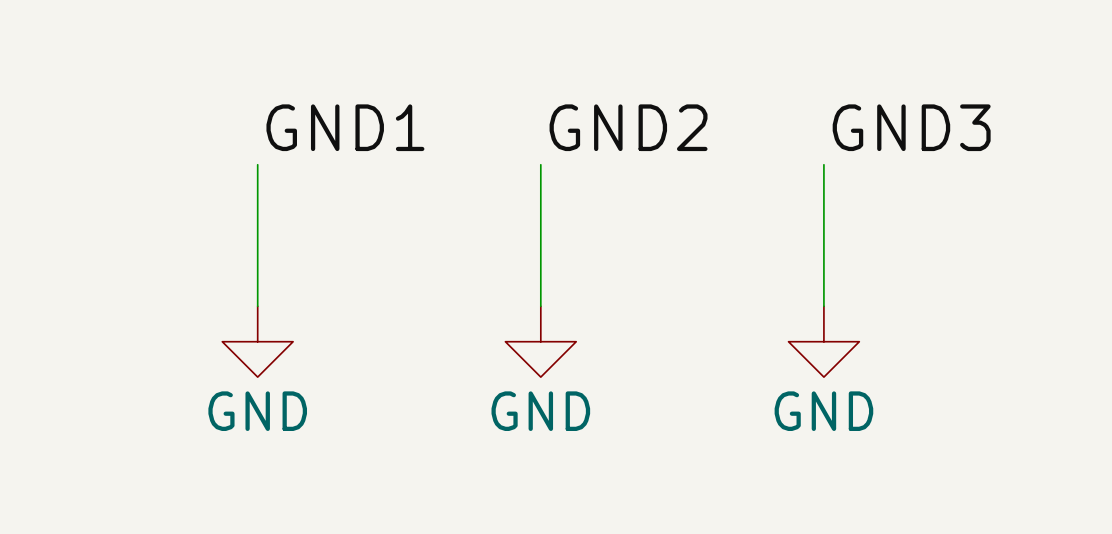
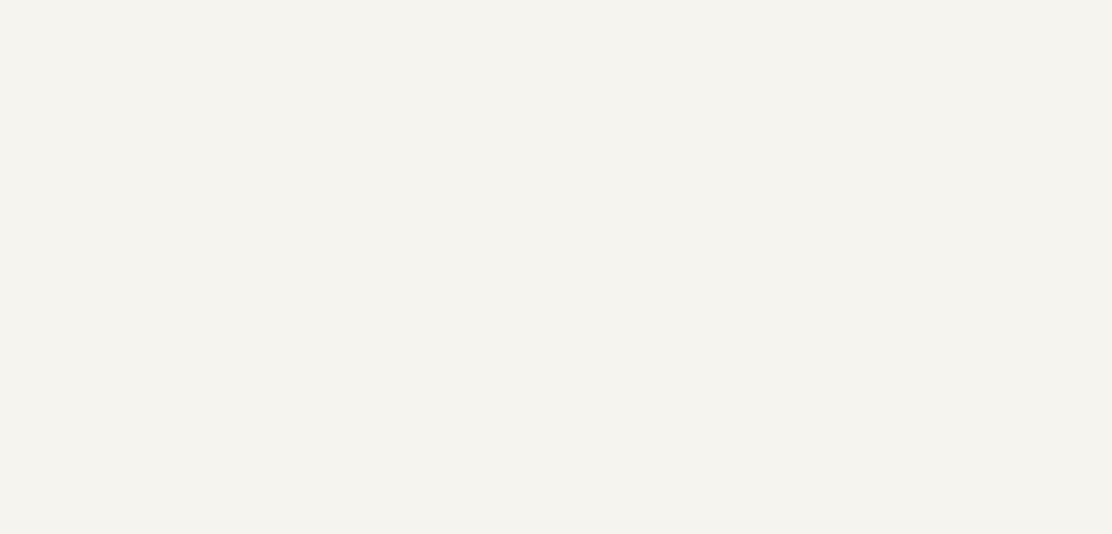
label: GND1 (345, 127) -> none
label: GND2 (628, 127) -> none
label: GND3 (911, 127) -> none
wire: (257, 164) (257, 306) -> none
wire: (540, 164) (540, 306) -> none
wire: (823, 164) (823, 306) -> none
power symbol: GND (257, 341) -> none
power symbol: GND (540, 341) -> none
power symbol: GND (823, 341) -> none

